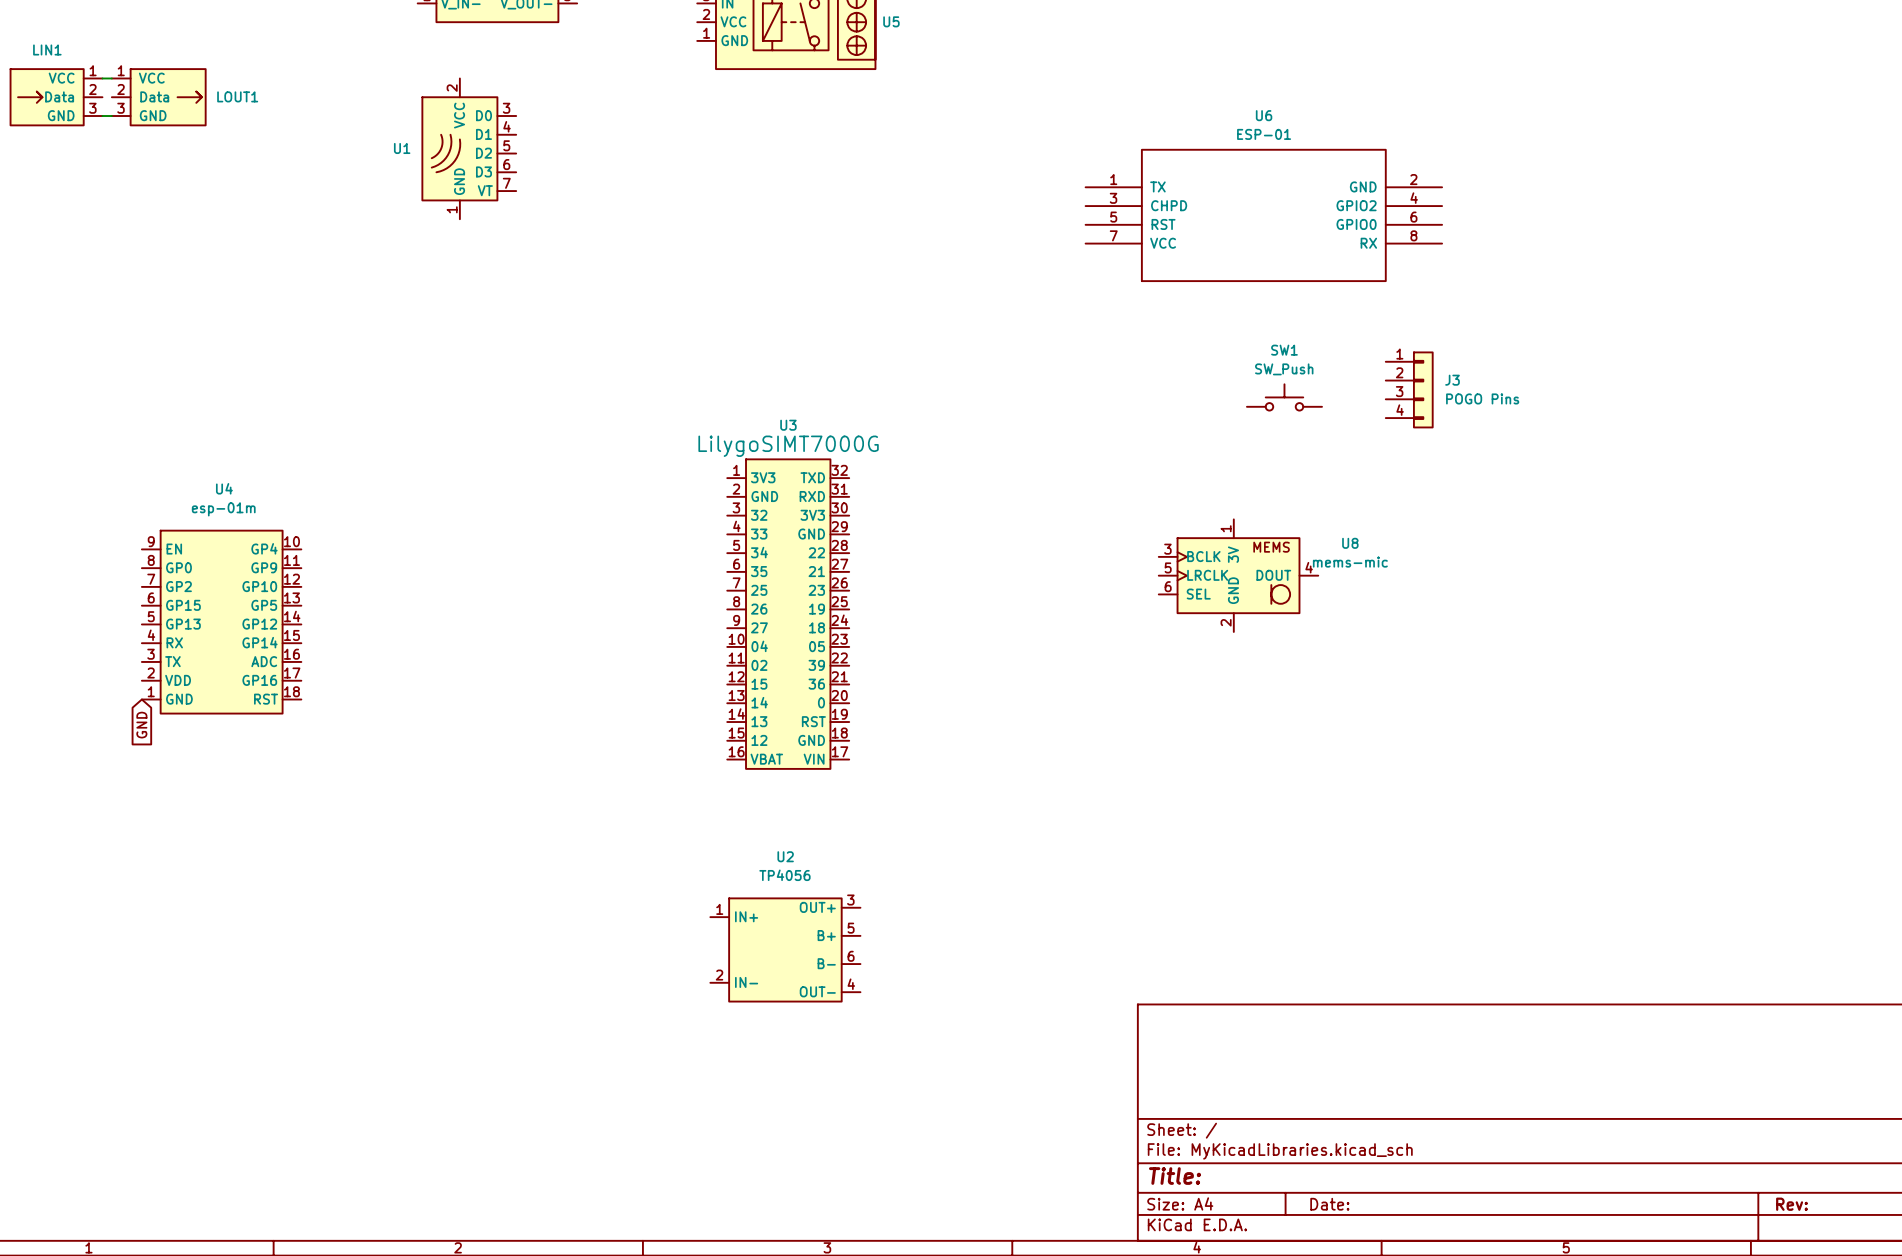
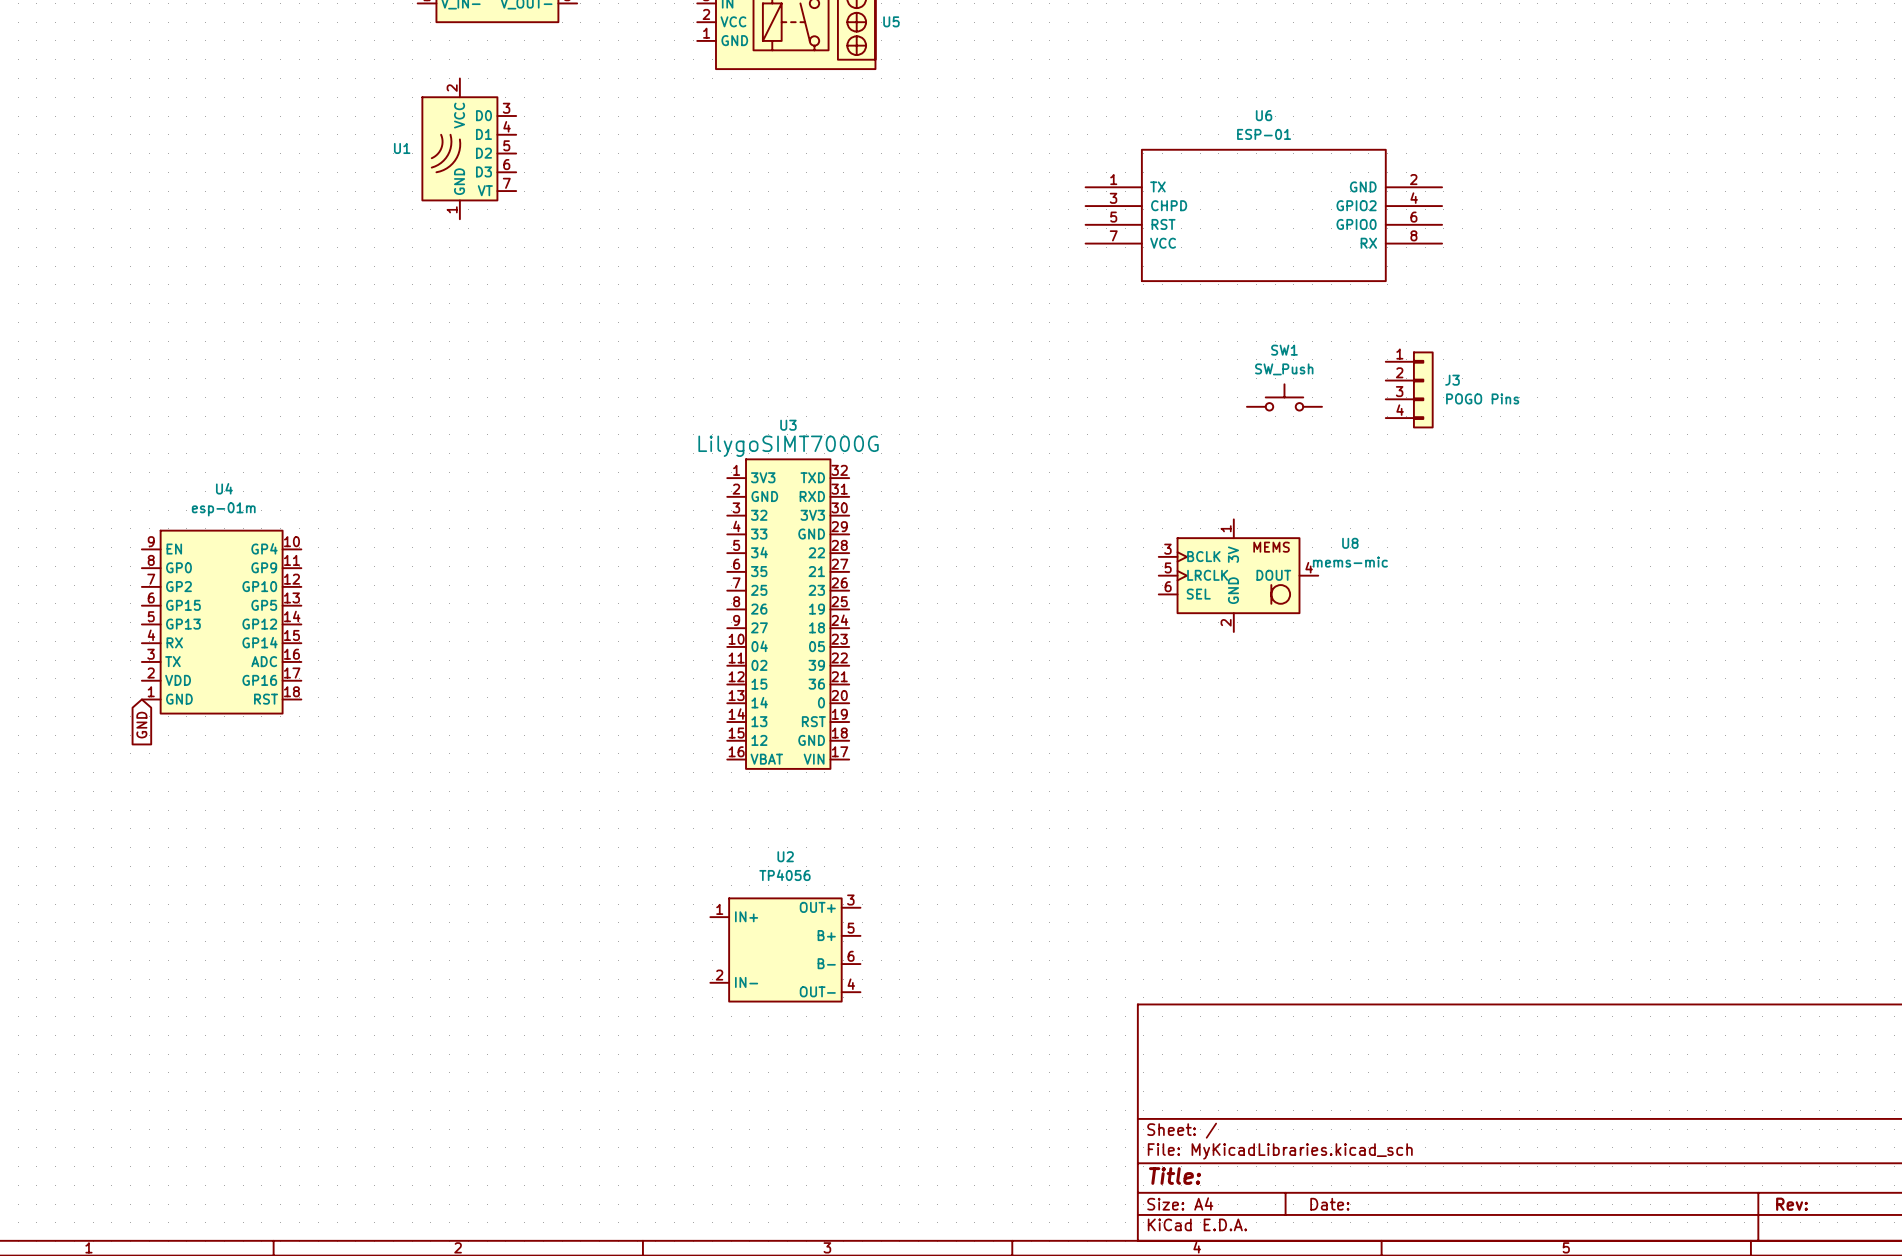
wire: (102, 78) (111, 78) -> none
LIN1: (56, 97) -> none
LOUT1: (159, 97) -> none
wire: (102, 116) (111, 116) -> none

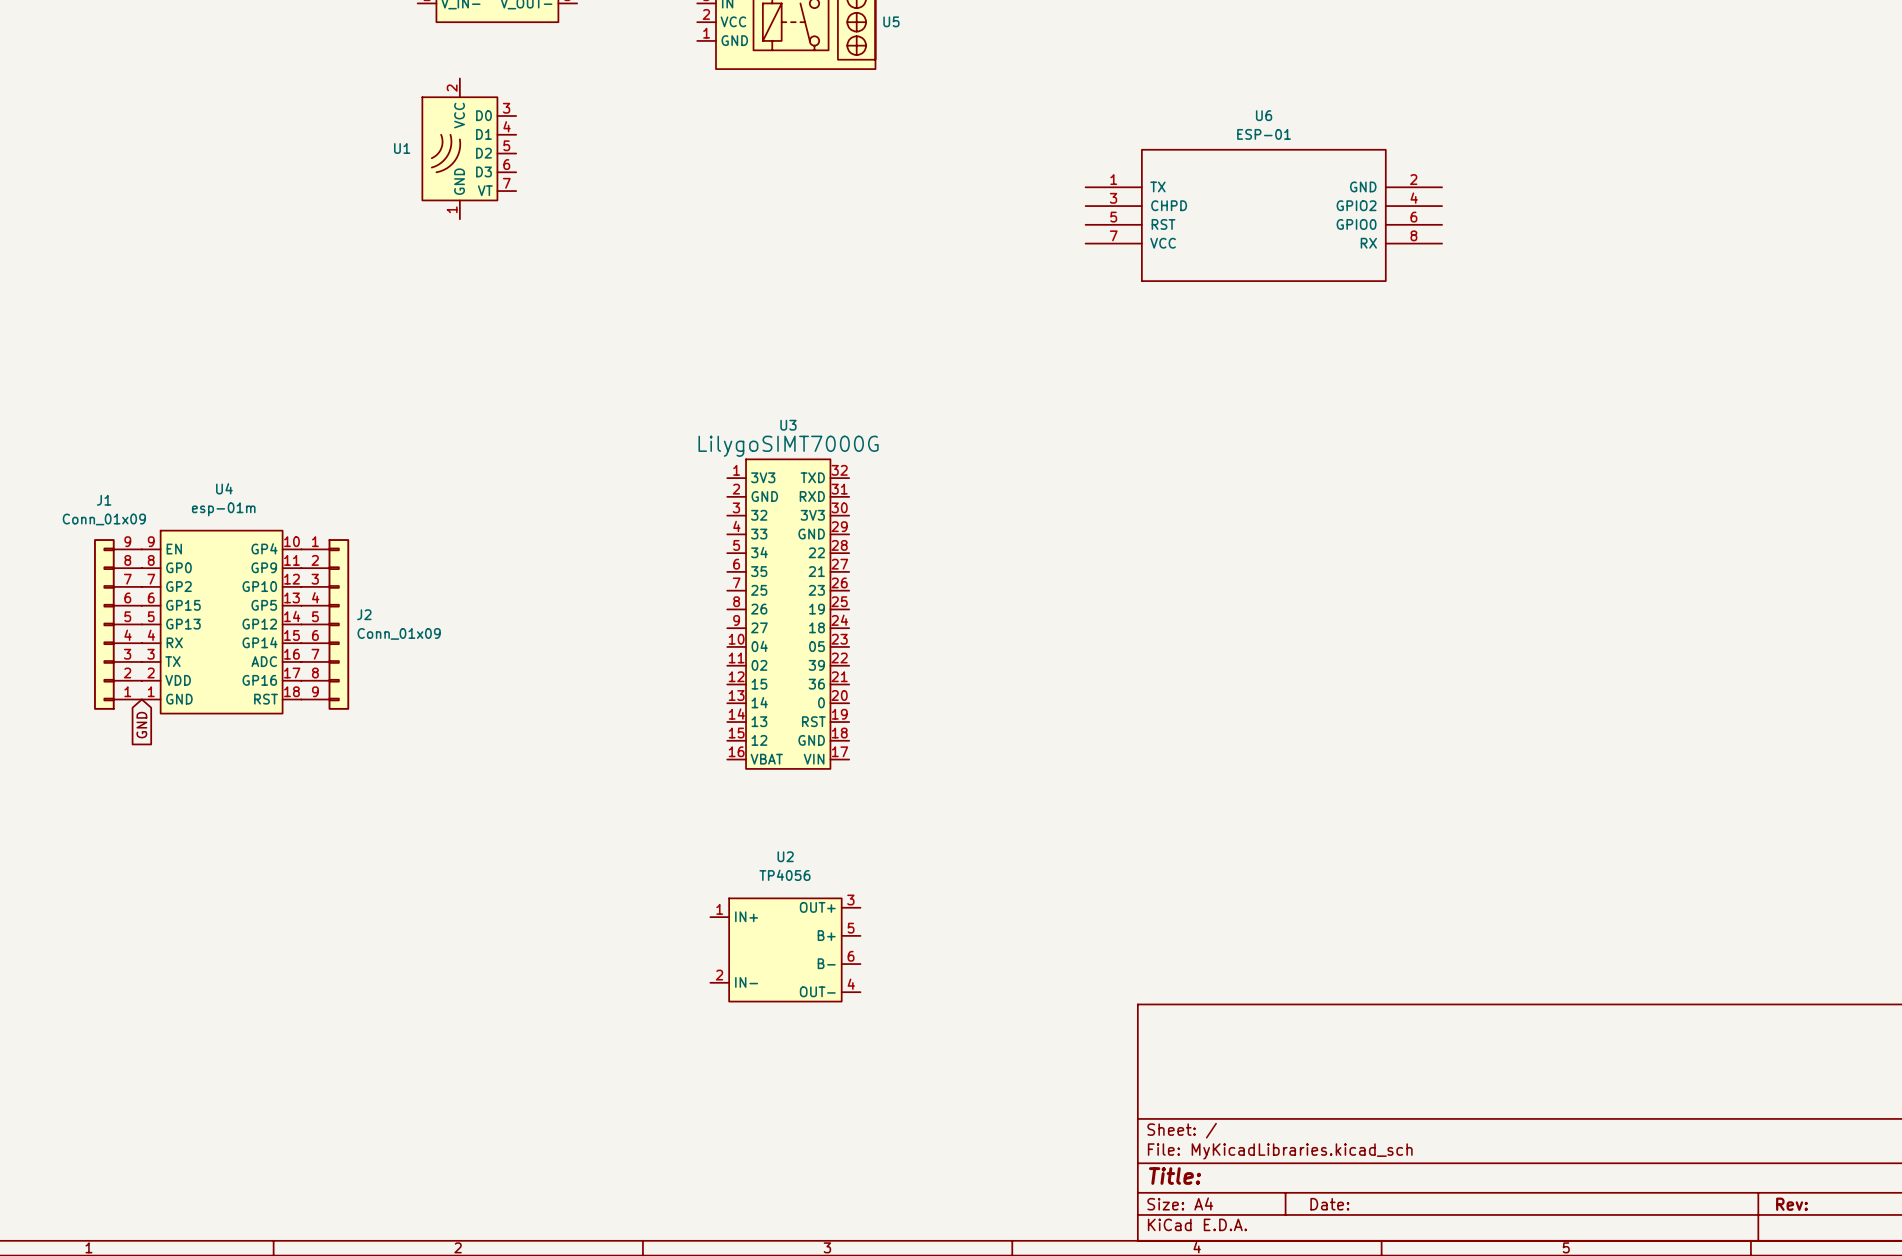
J3: POGO Pins (1409, 389) -> none
SW1: SW_Push (1284, 397) -> none
U8: mems-mic (1238, 575) -> none
J1: none -> Conn_01x09 (117, 624)
J2: none -> Conn_01x09 (325, 624)

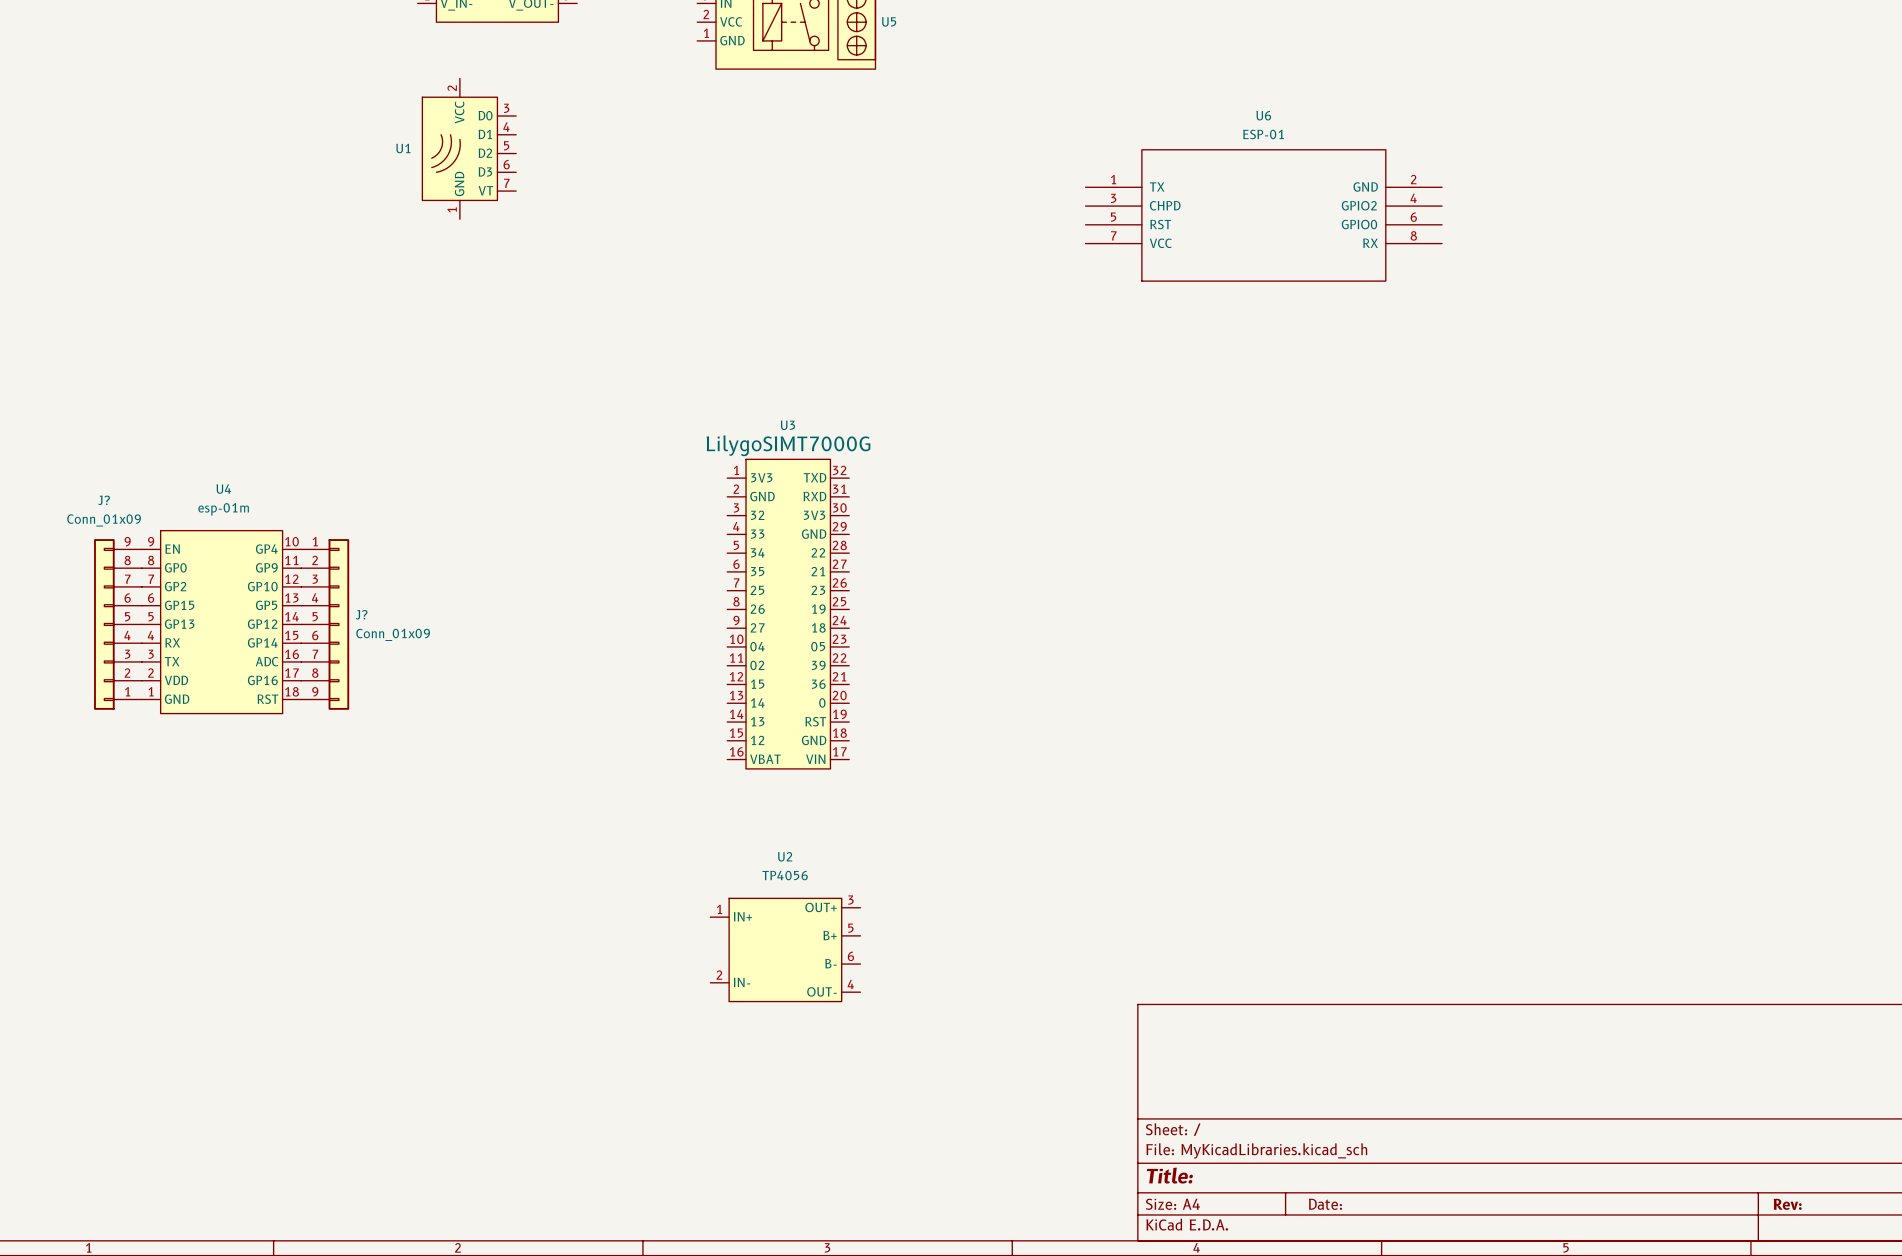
J1 name: J1 (104, 500) -> J? (104, 500)
J2 name: J2 (364, 614) -> J? (361, 614)
global label: GND (141, 725) -> none

